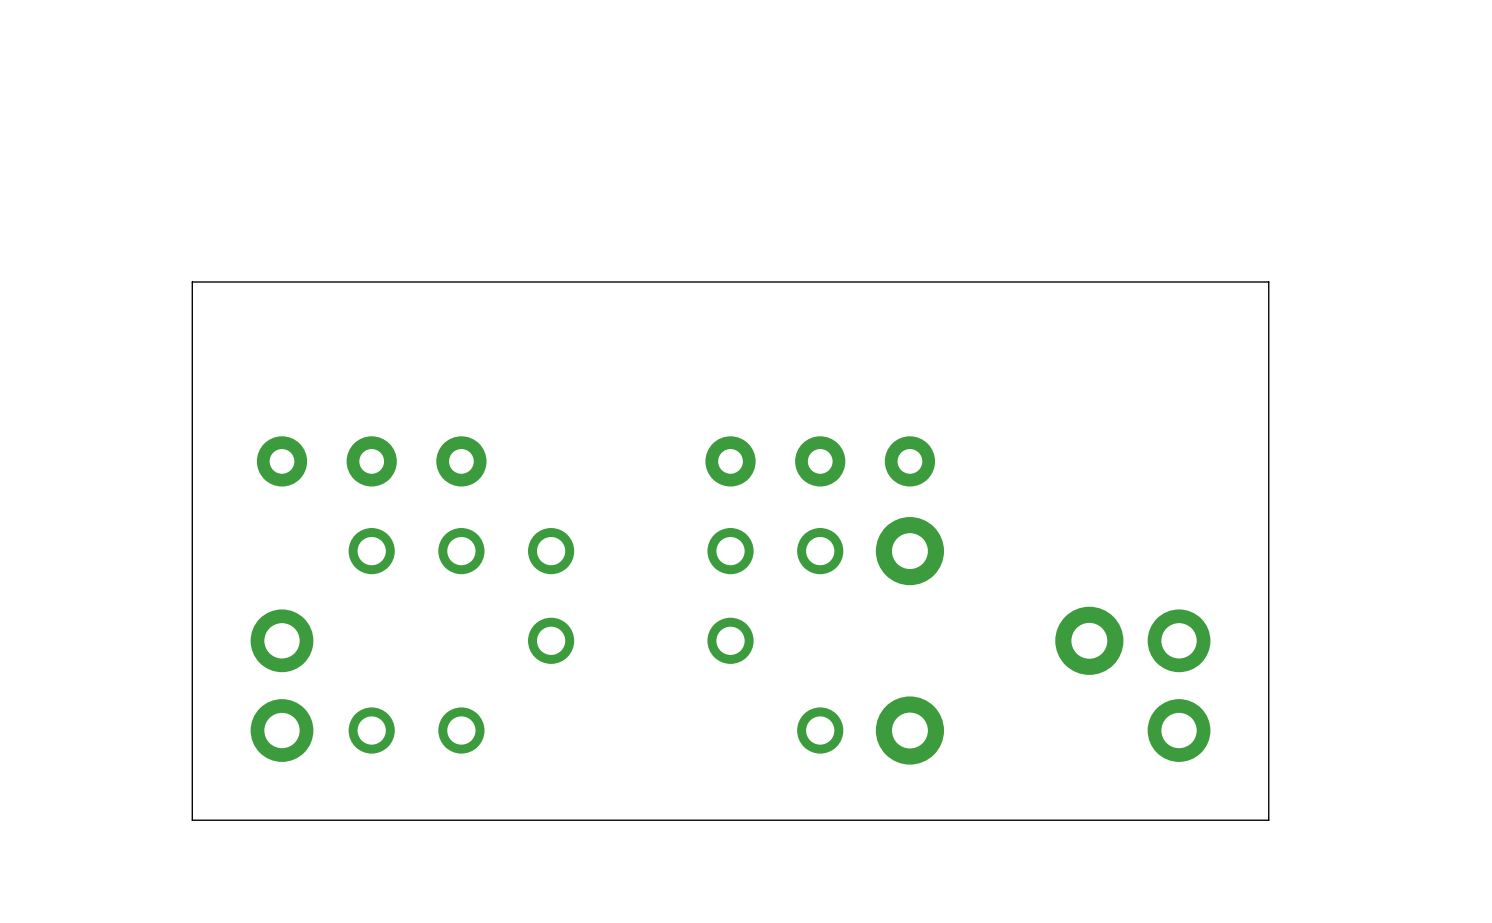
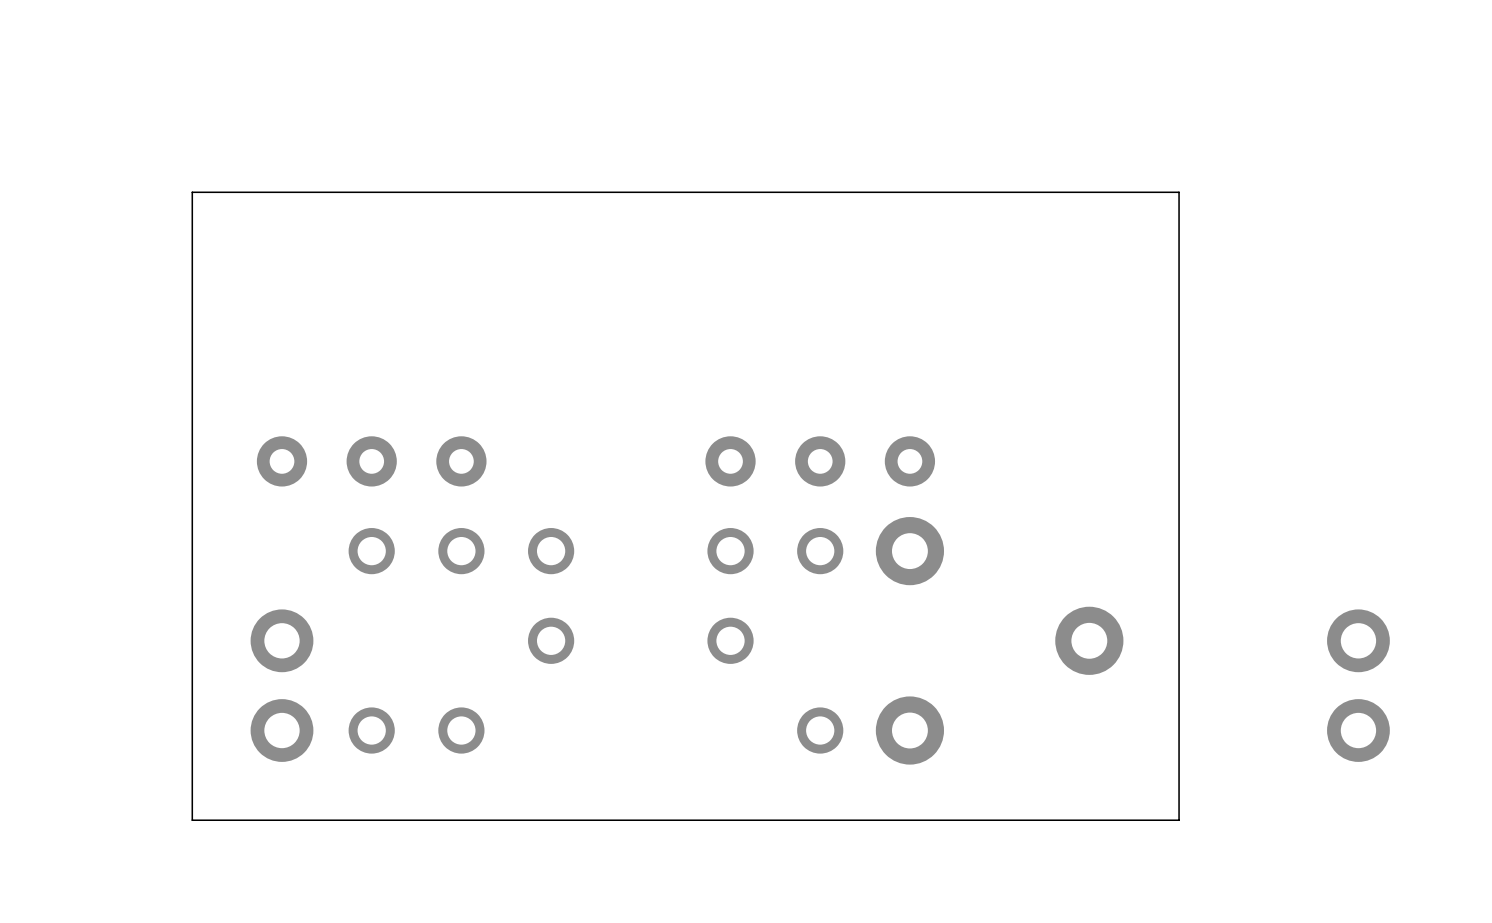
board edge: (192, 281) (1268, 281) (1268, 820) (1179, 820) -> (192, 281) (192, 192) (1179, 192) (1179, 820)
part position: (1179, 685) -> (1358, 685)

